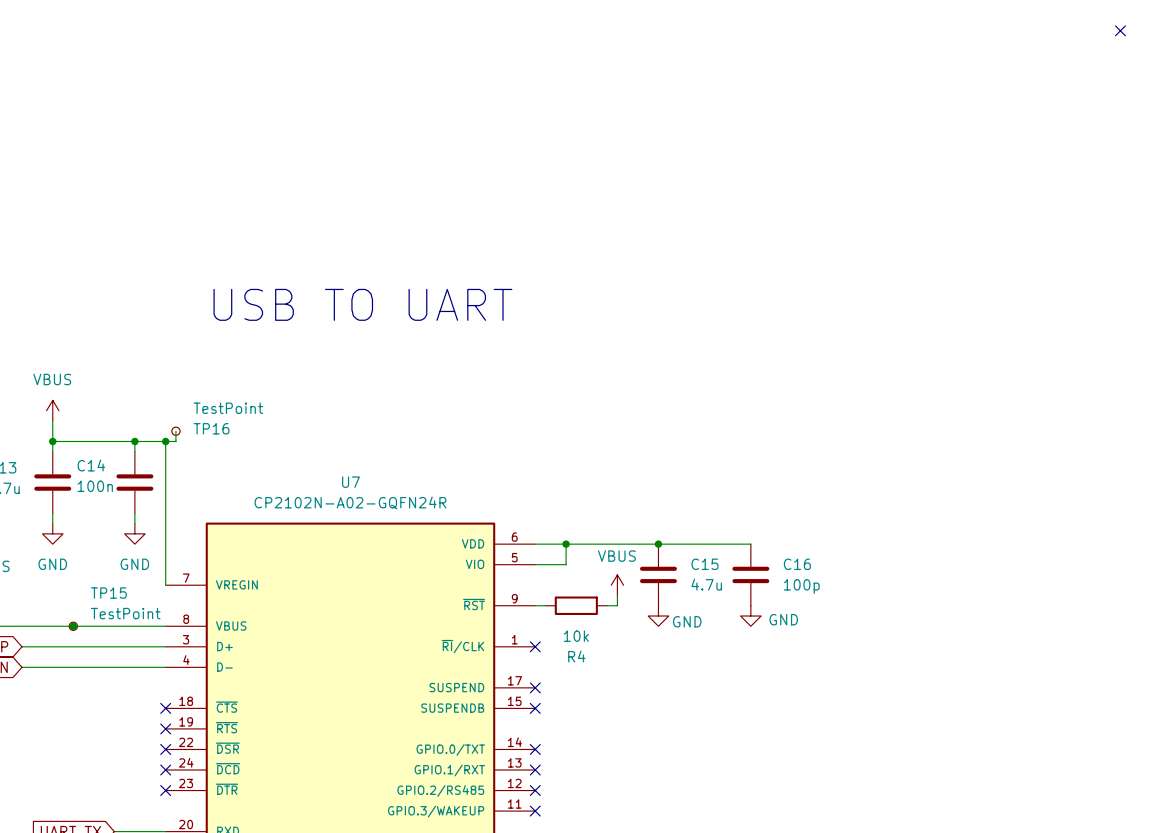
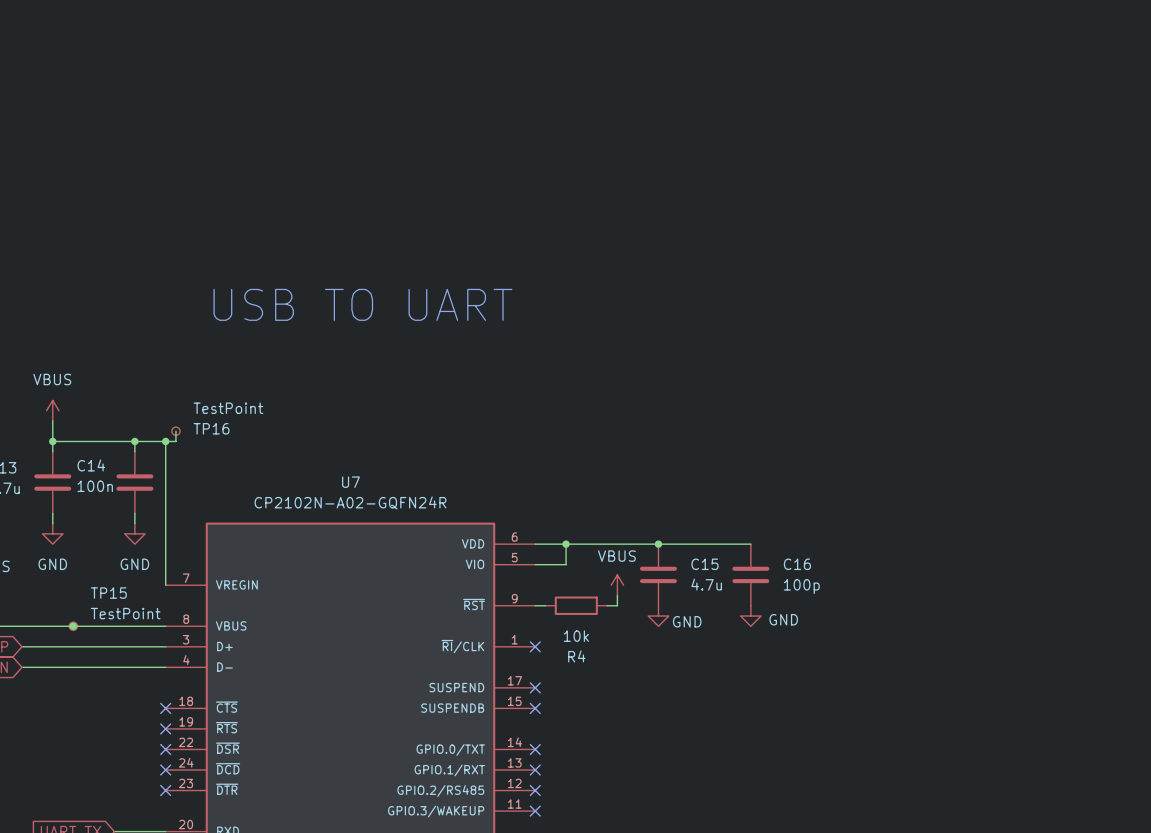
no-connect mark: (1120, 30) -> none

